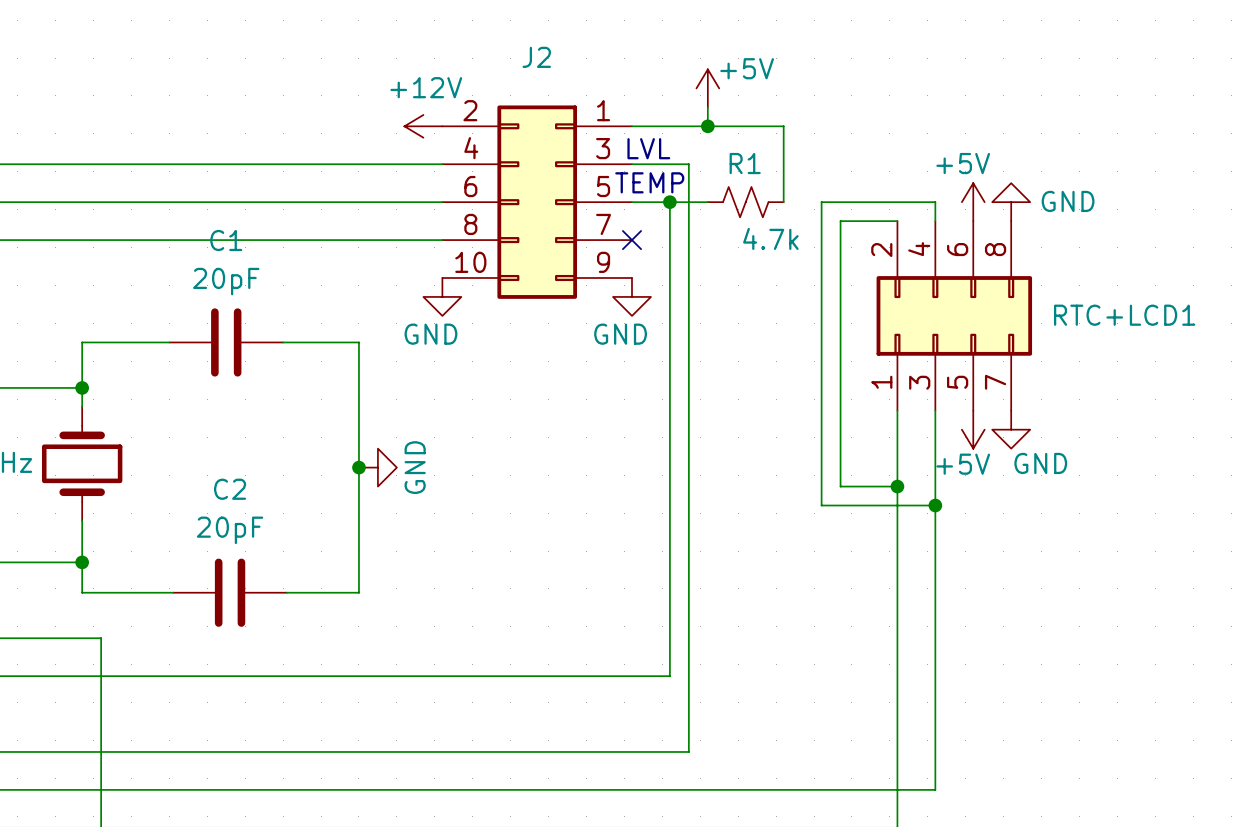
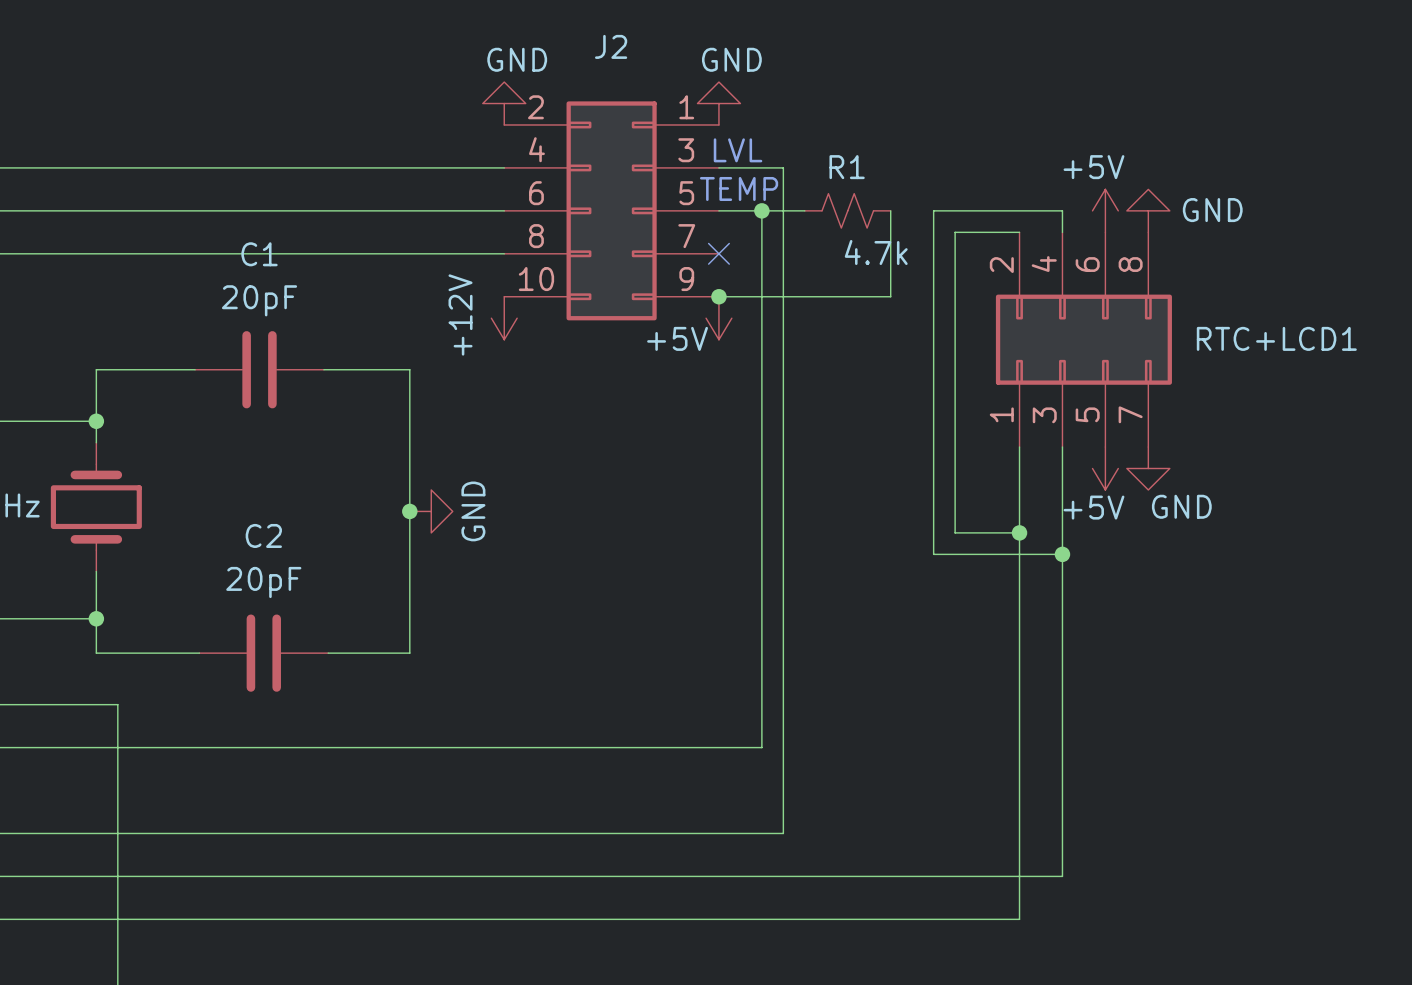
power symbol: +5V (707, 88) -> none
power symbol: none -> GND (504, 103)
power symbol: none -> GND (718, 103)
wire: (707, 107) (707, 126) -> none
power symbol: +12V (423, 126) -> none
wire: (632, 126) (783, 126) (783, 202) -> (718, 296) (890, 296) (890, 210)
junction: (707, 126) -> none
junction: none -> (718, 296)
power symbol: GND (442, 296) -> +12V (504, 318)
power symbol: GND (632, 296) -> +5V (718, 318)

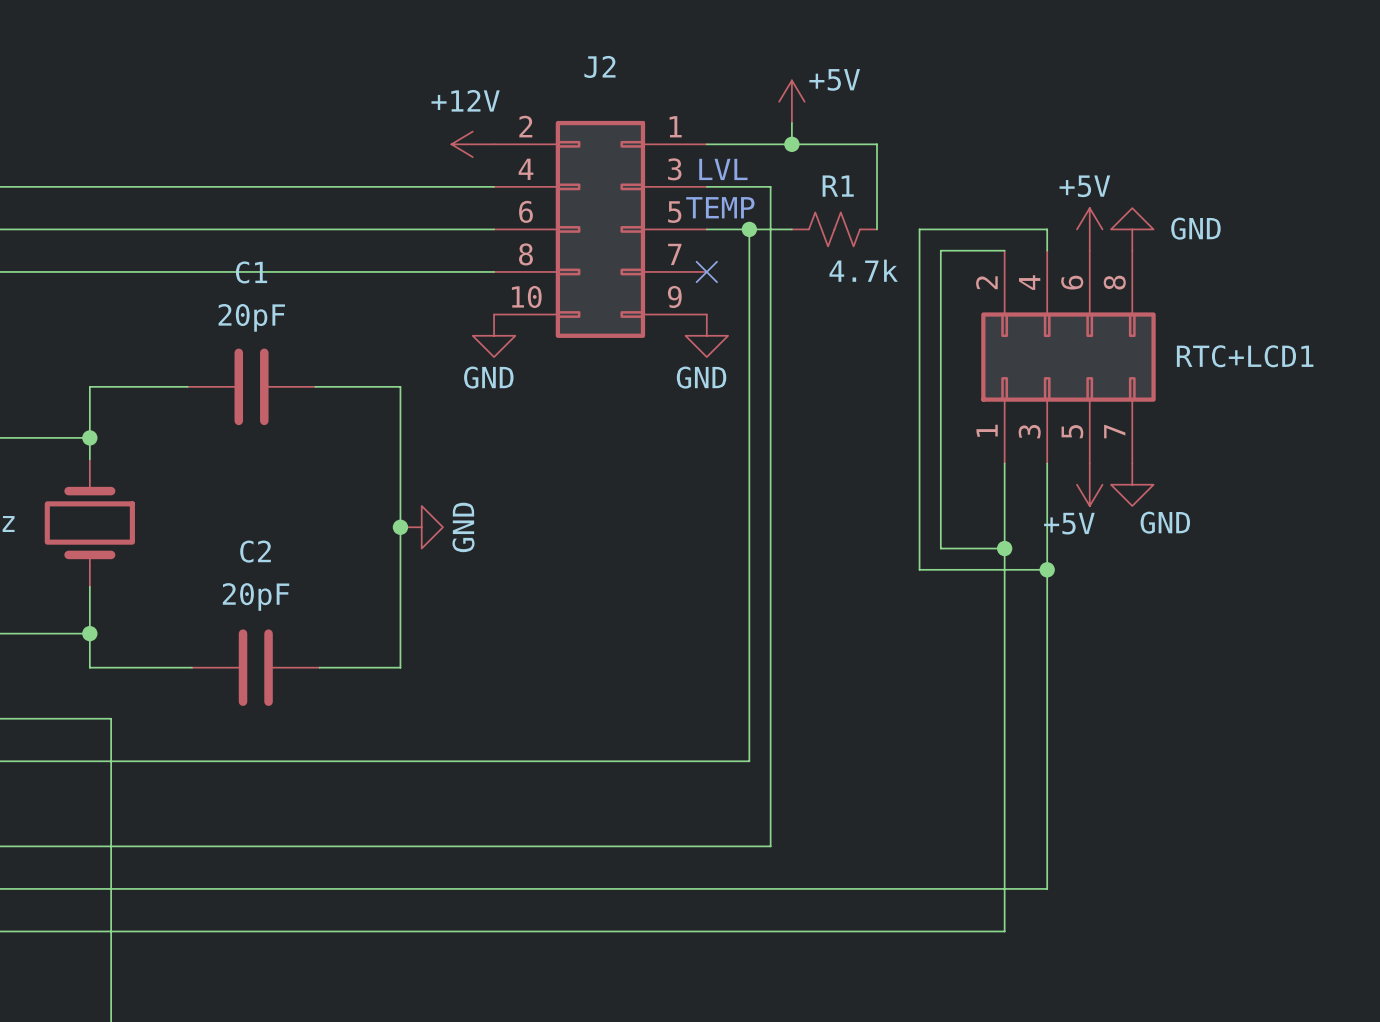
power symbol: none -> +5V (791, 101)
power symbol: GND (504, 103) -> none
power symbol: GND (718, 103) -> none
wire: none -> (791, 123) (791, 144)
power symbol: none -> +12V (472, 144)
junction: none -> (791, 144)
wire: (890, 210) (890, 296) (718, 296) -> (877, 229) (877, 144) (706, 144)
junction: (718, 296) -> none
power symbol: +12V (504, 318) -> GND (494, 335)
power symbol: +5V (718, 318) -> GND (706, 335)

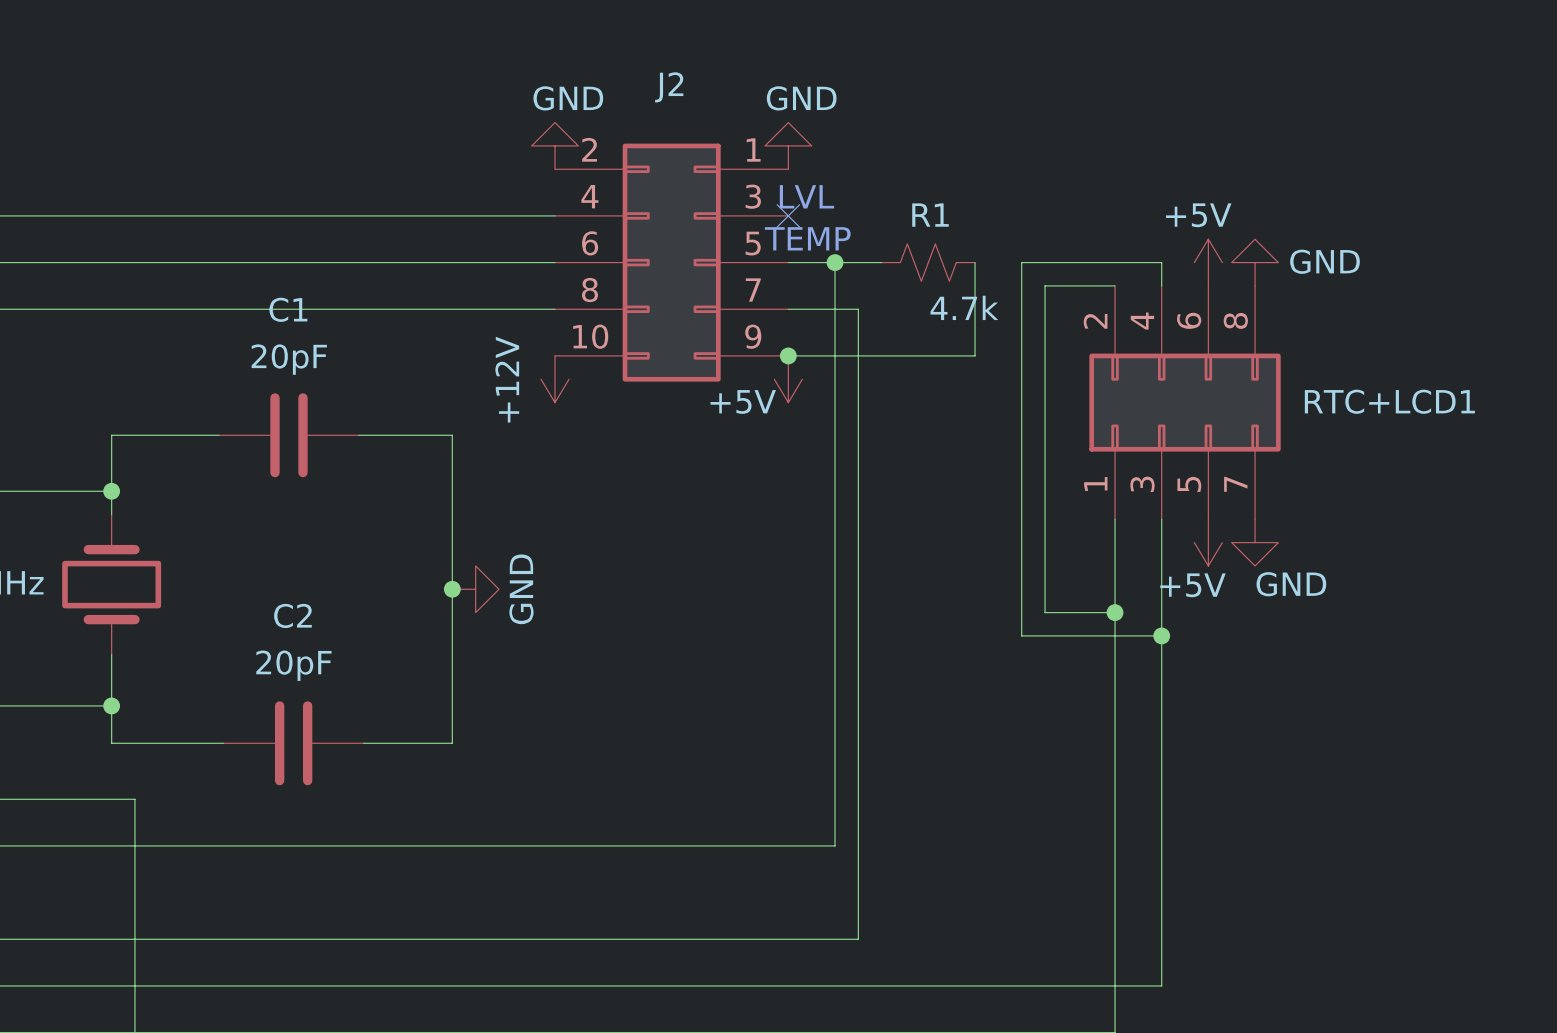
power symbol: +5V (791, 101) -> none
power symbol: none -> GND (555, 145)
power symbol: none -> GND (788, 145)
wire: (791, 123) (791, 144) -> none
power symbol: +12V (472, 144) -> none
wire: (706, 144) (877, 144) (877, 229) -> (788, 355) (975, 355) (975, 262)
junction: (791, 144) -> none
wire: (706, 186) (770, 186) (770, 271) -> (788, 309) (858, 309)
no-connect mark position: (706, 271) -> (788, 215)
junction: none -> (788, 355)
power symbol: GND (494, 335) -> +12V (555, 379)
power symbol: GND (706, 335) -> +5V (788, 379)

